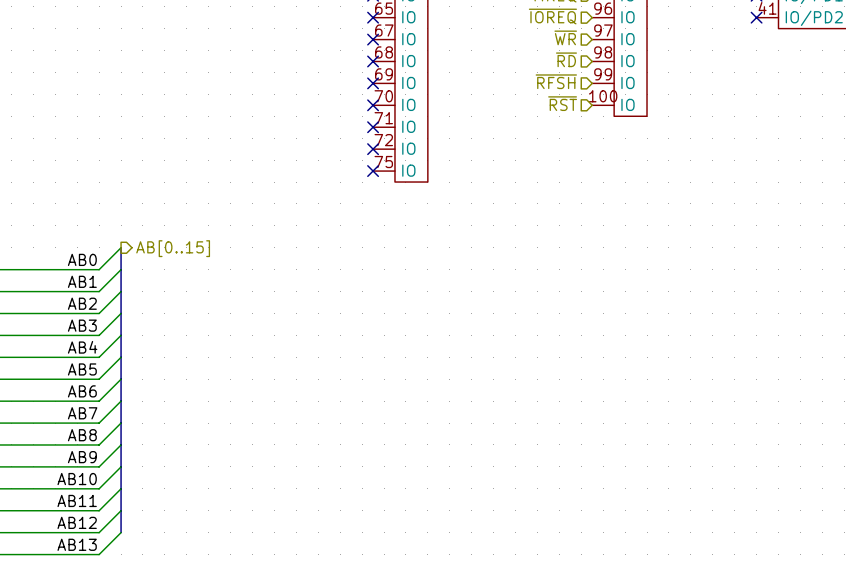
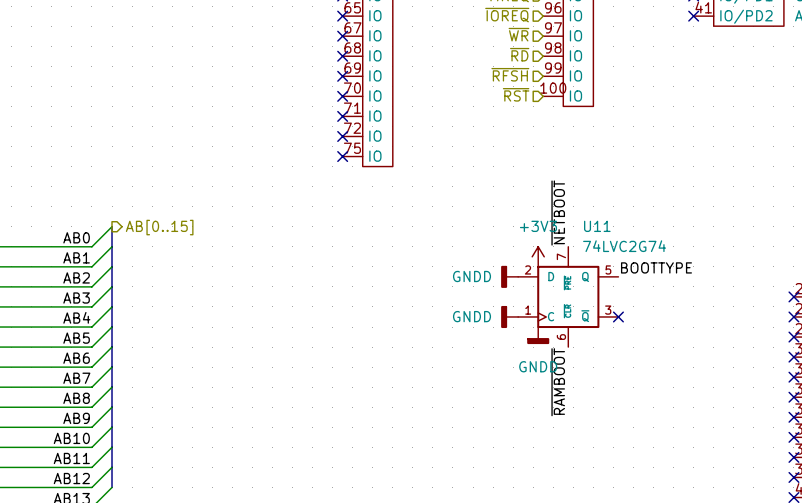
label: none -> ~{NETBOOT} (558, 213)
power symbol: none -> +3V3 (538, 256)
label: none -> BOOTTYPE (656, 267)
power symbol: none -> GNDD (509, 276)
U11: none -> 74LVC2G74 (568, 296)
power symbol: none -> GNDD (509, 316)
no-connect mark: none -> (618, 316)
power symbol: none -> GNDD (538, 335)
label: none -> ~{RAMBOOT} (558, 382)

